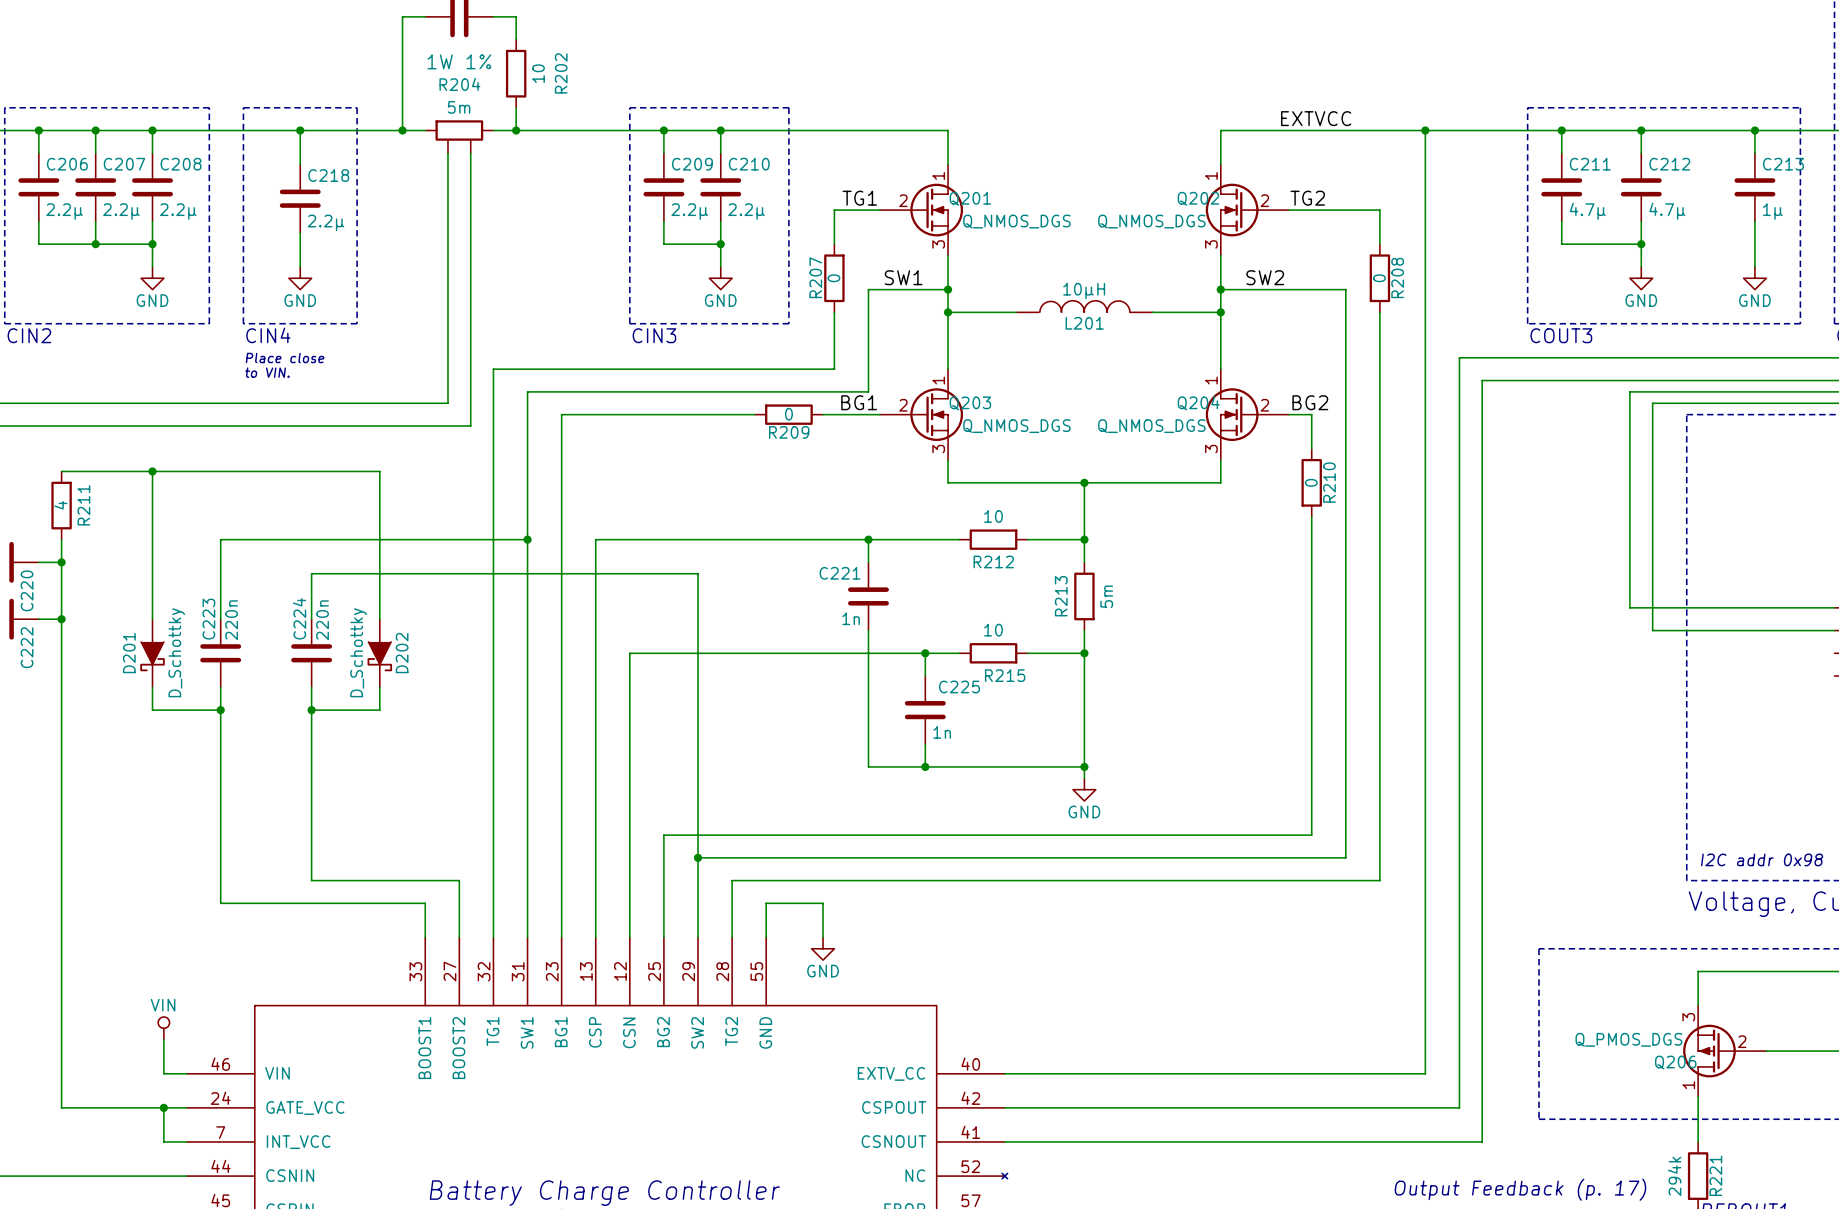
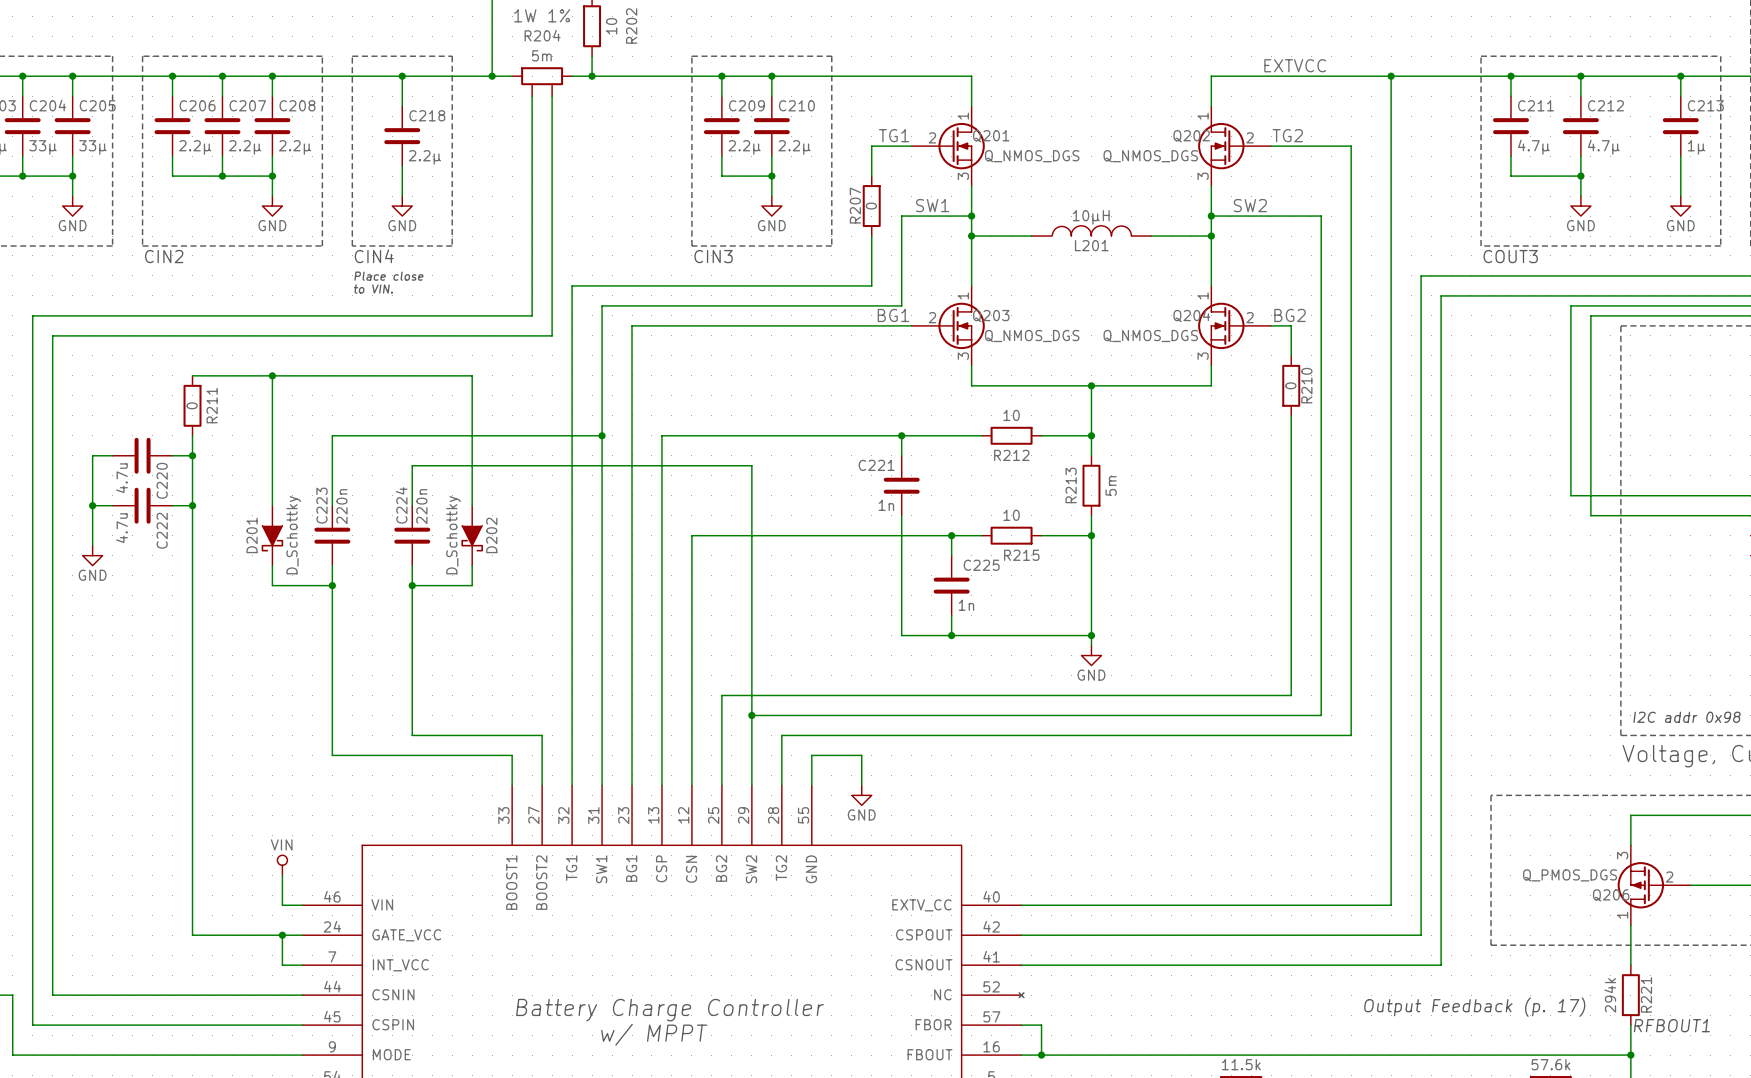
wire: none -> (1351, 176) (1351, 236)
R208: 0 (1379, 278) -> none
wire: none -> (801, 325) (861, 325)
R209: 0 (788, 414) -> none
R211 value: 4 (60, 505) -> 0 (192, 405)

